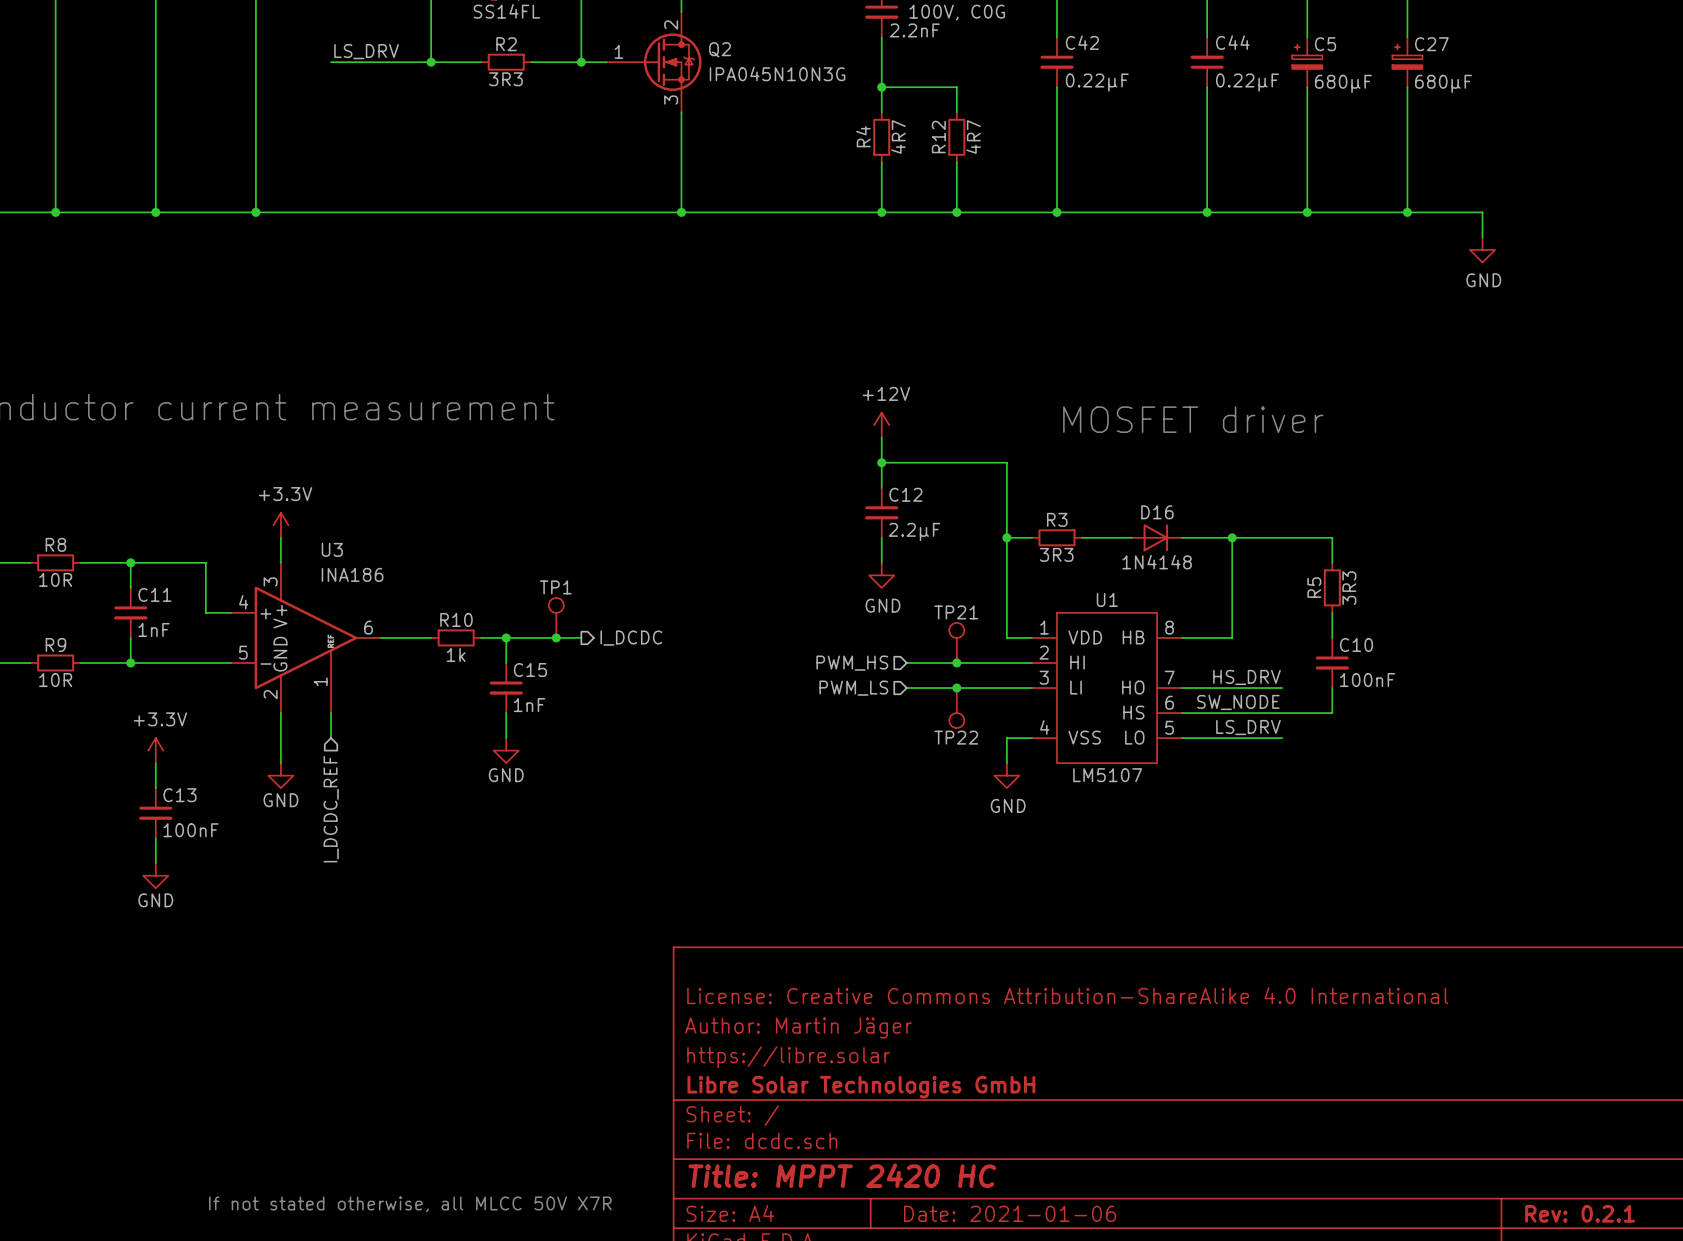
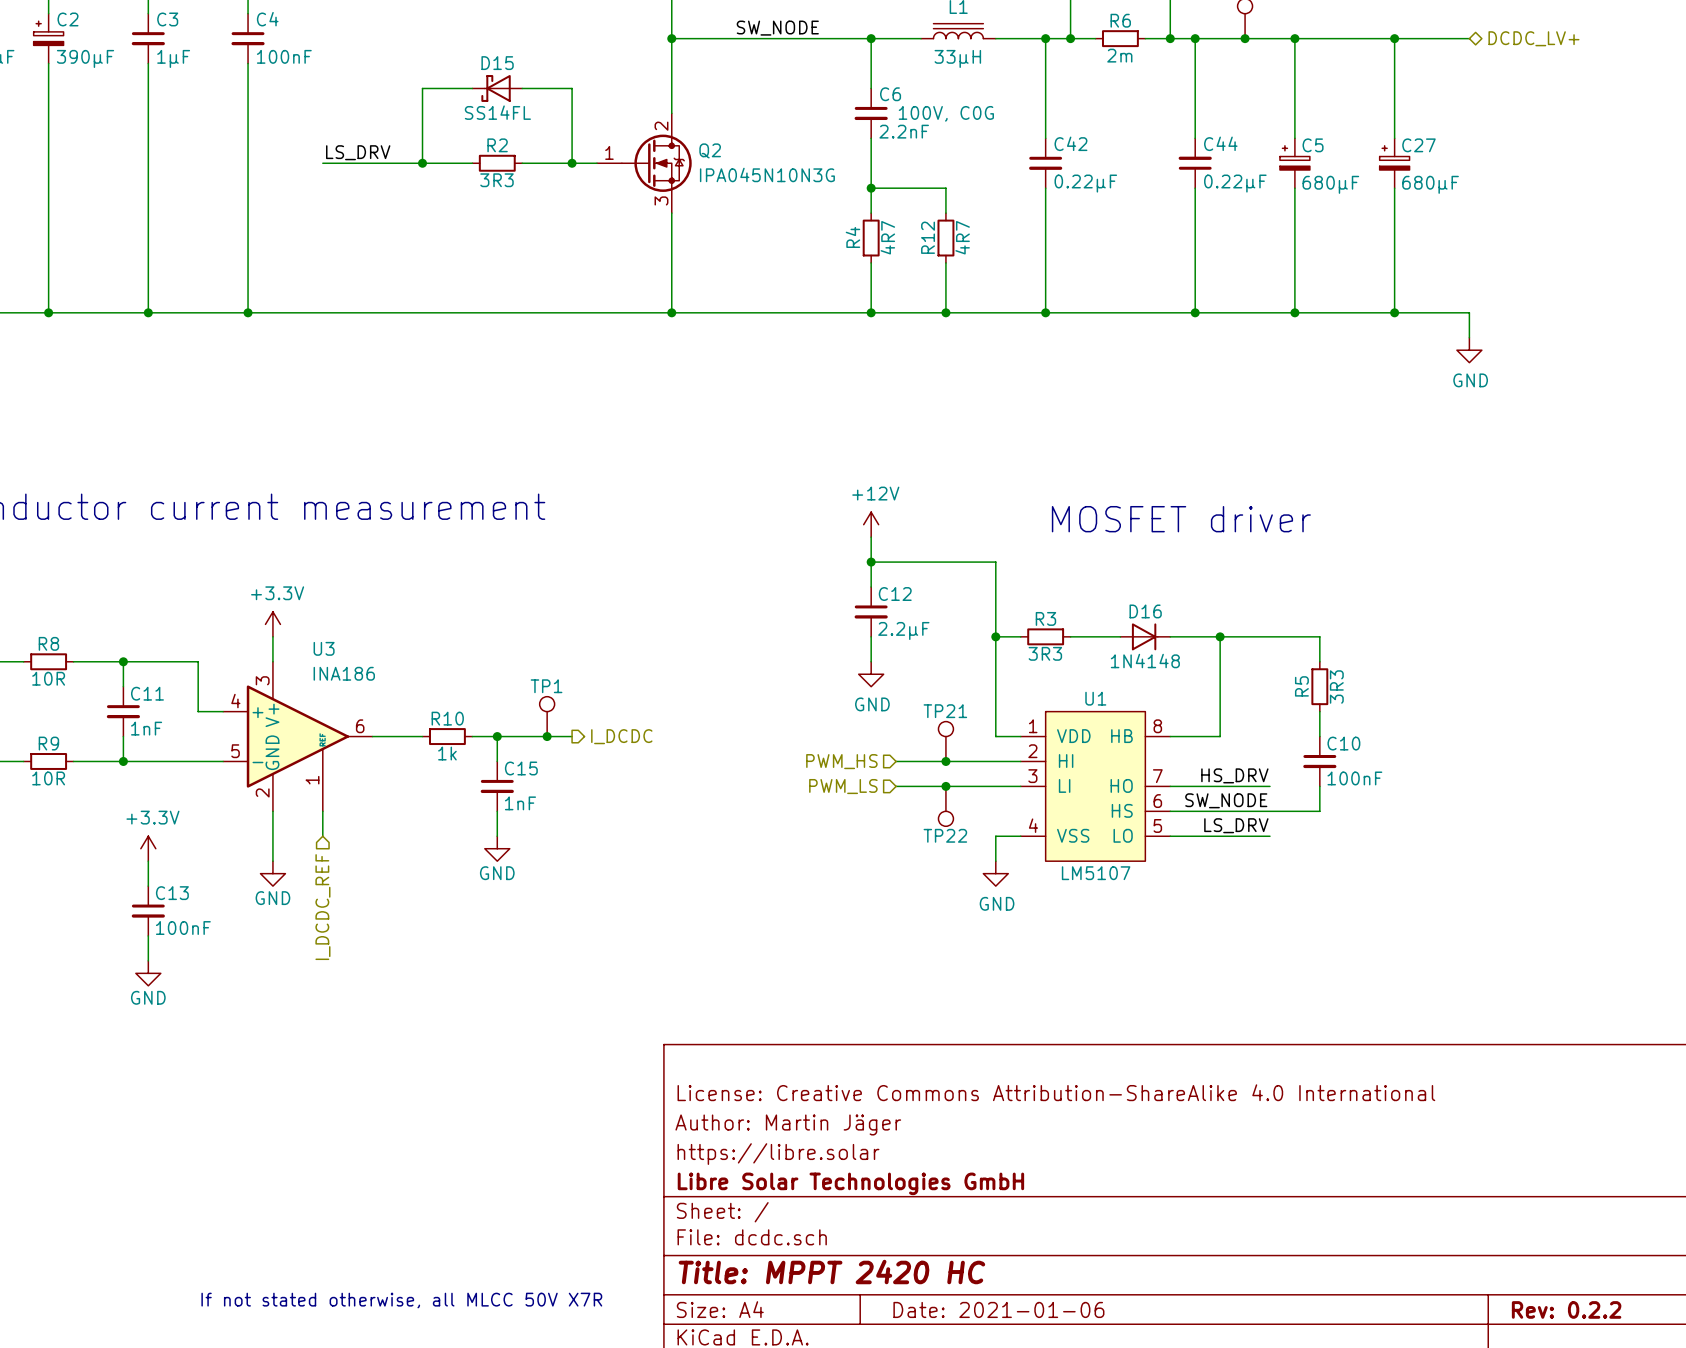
title block: Rev: 0.2.1 (1580, 1213) -> Rev: 0.2.2 (1566, 1309)

